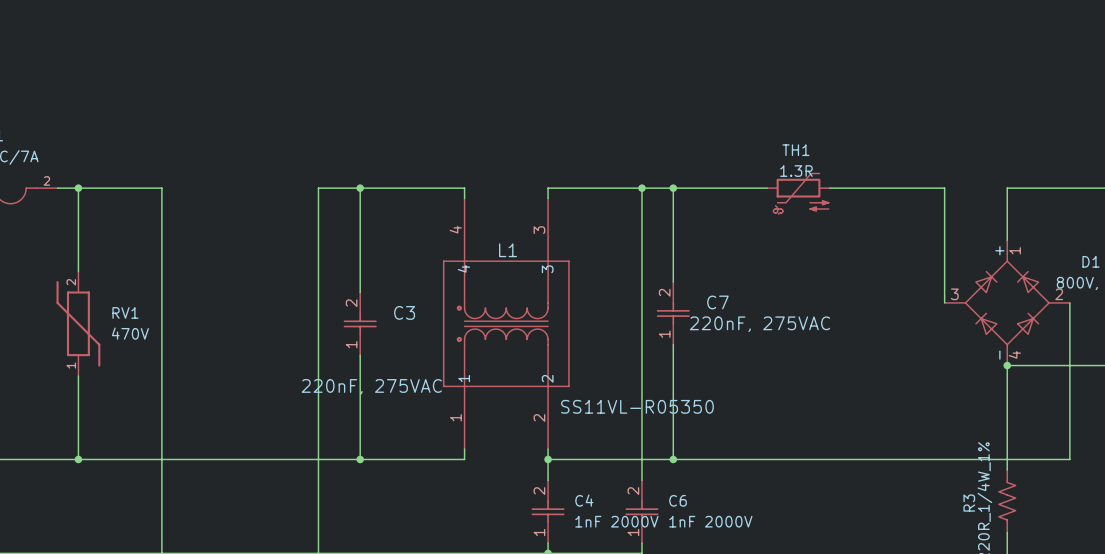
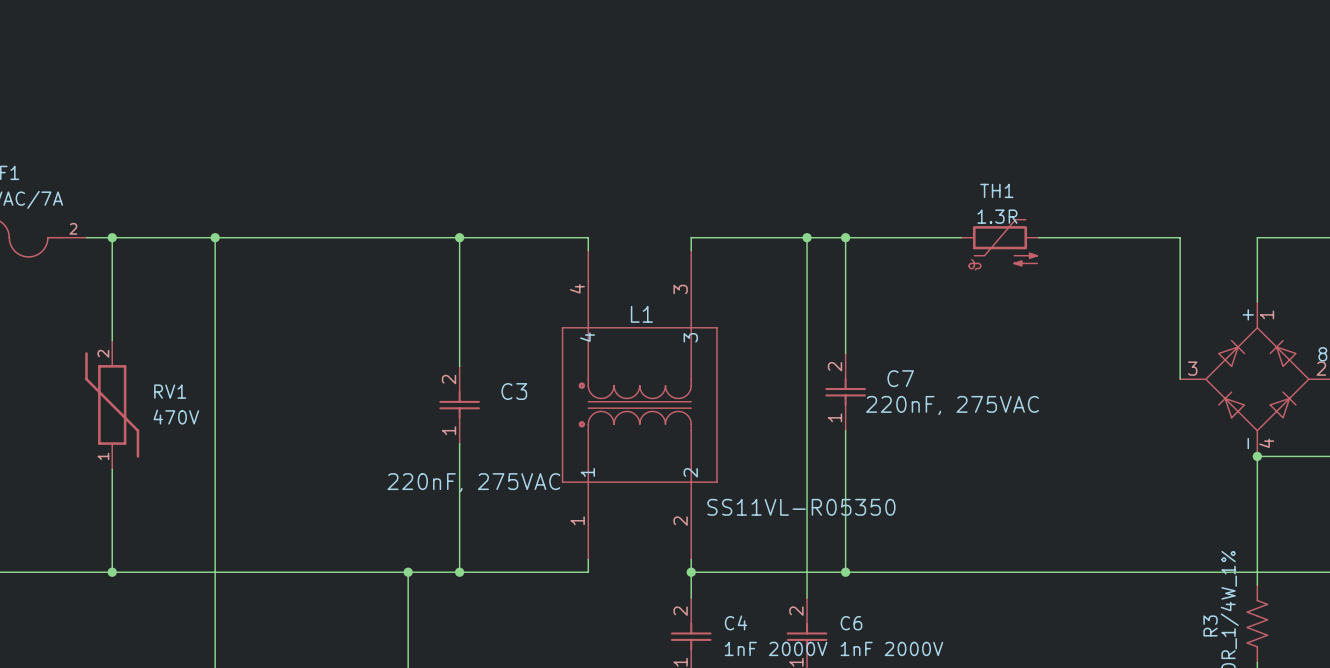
junction: none -> (215, 237)
wire: (318, 188) (318, 459) -> (408, 237) (215, 237)
junction: none -> (408, 572)

